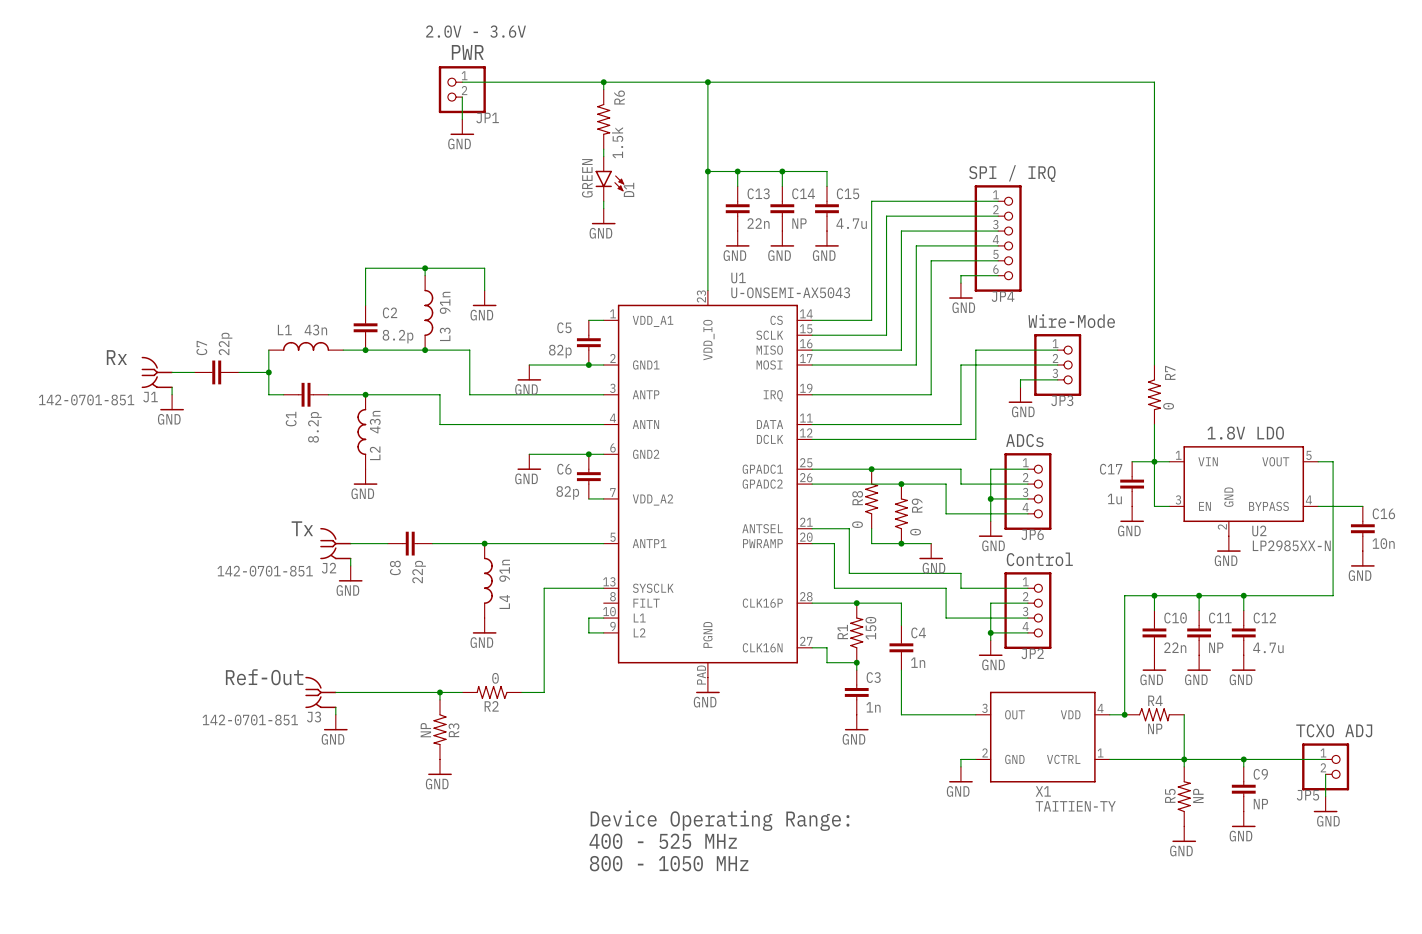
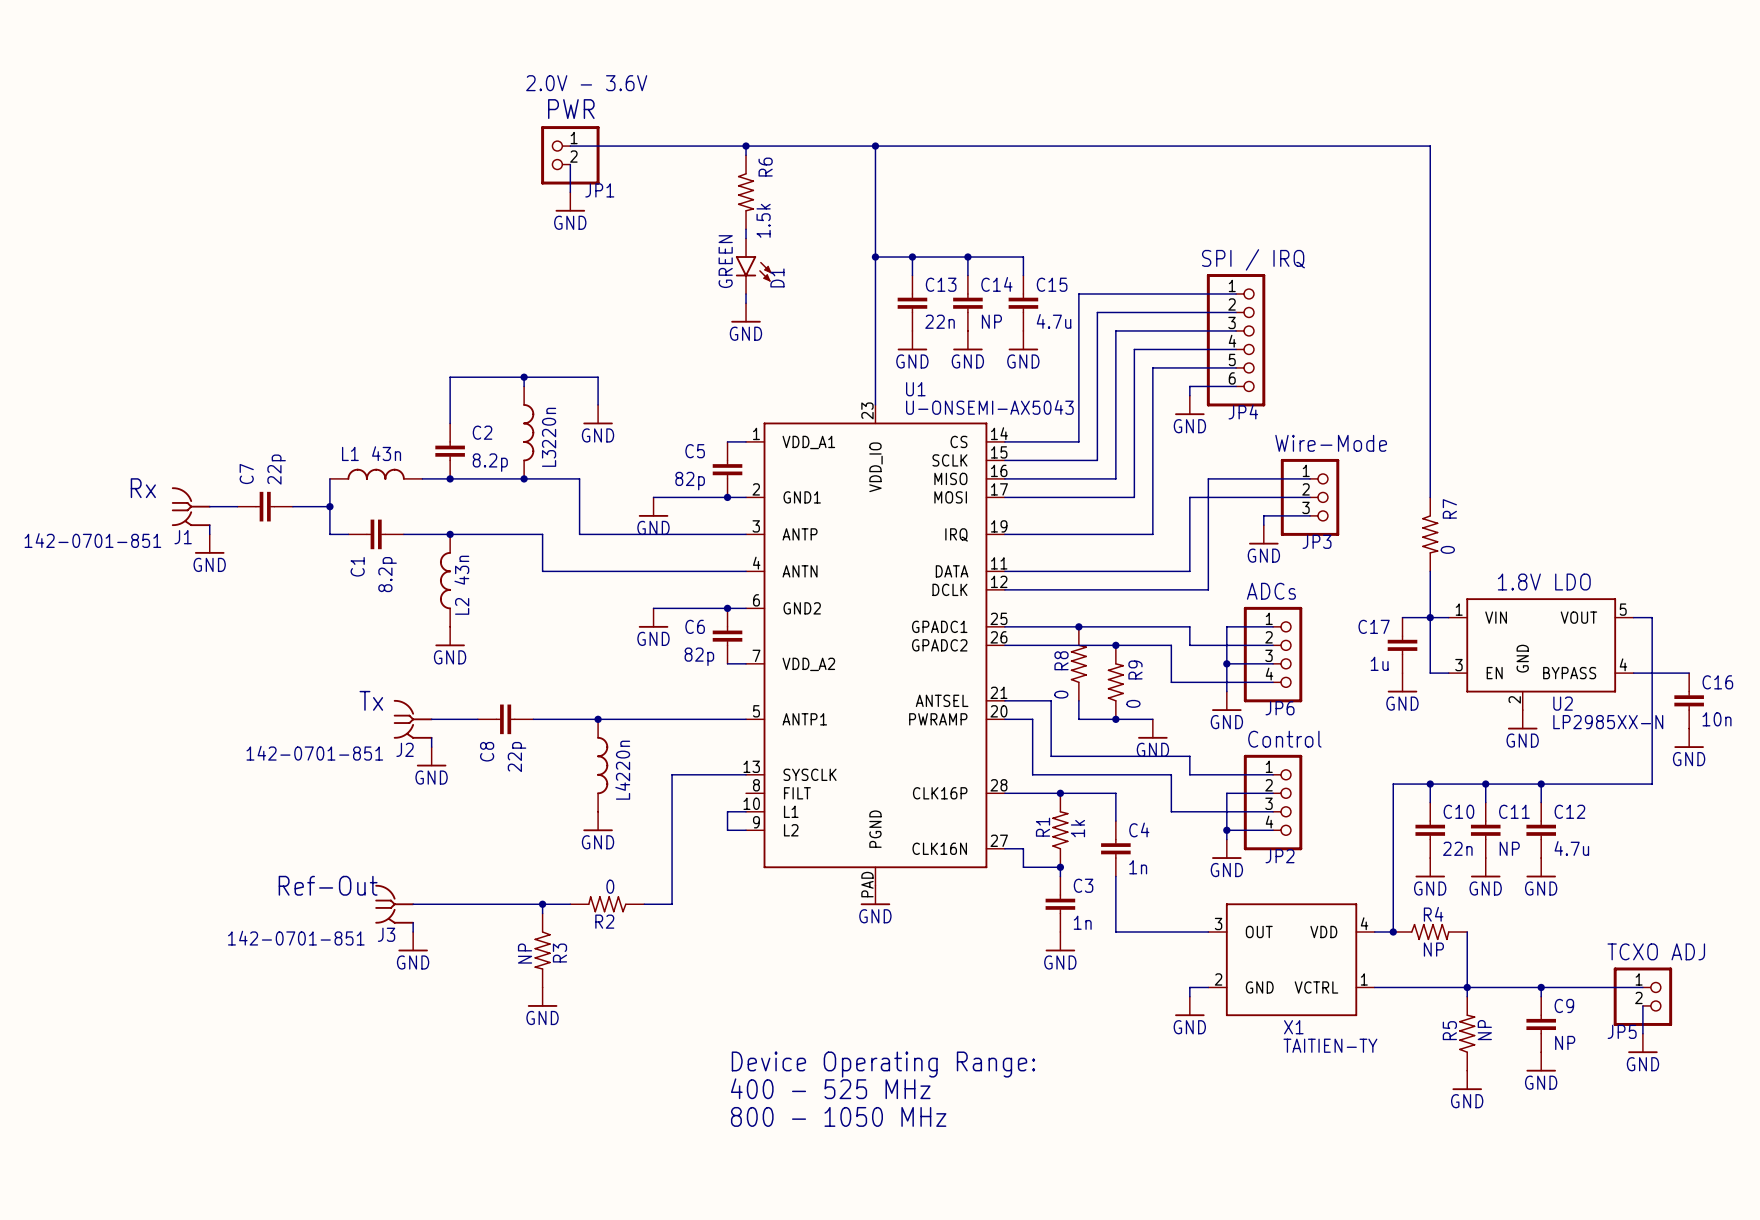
L3 value: 91n (445, 302) -> 220n (549, 428)
L4 value: 91n (504, 570) -> 220n (623, 760)
R1 value: 150 (870, 628) -> 1k (1077, 828)

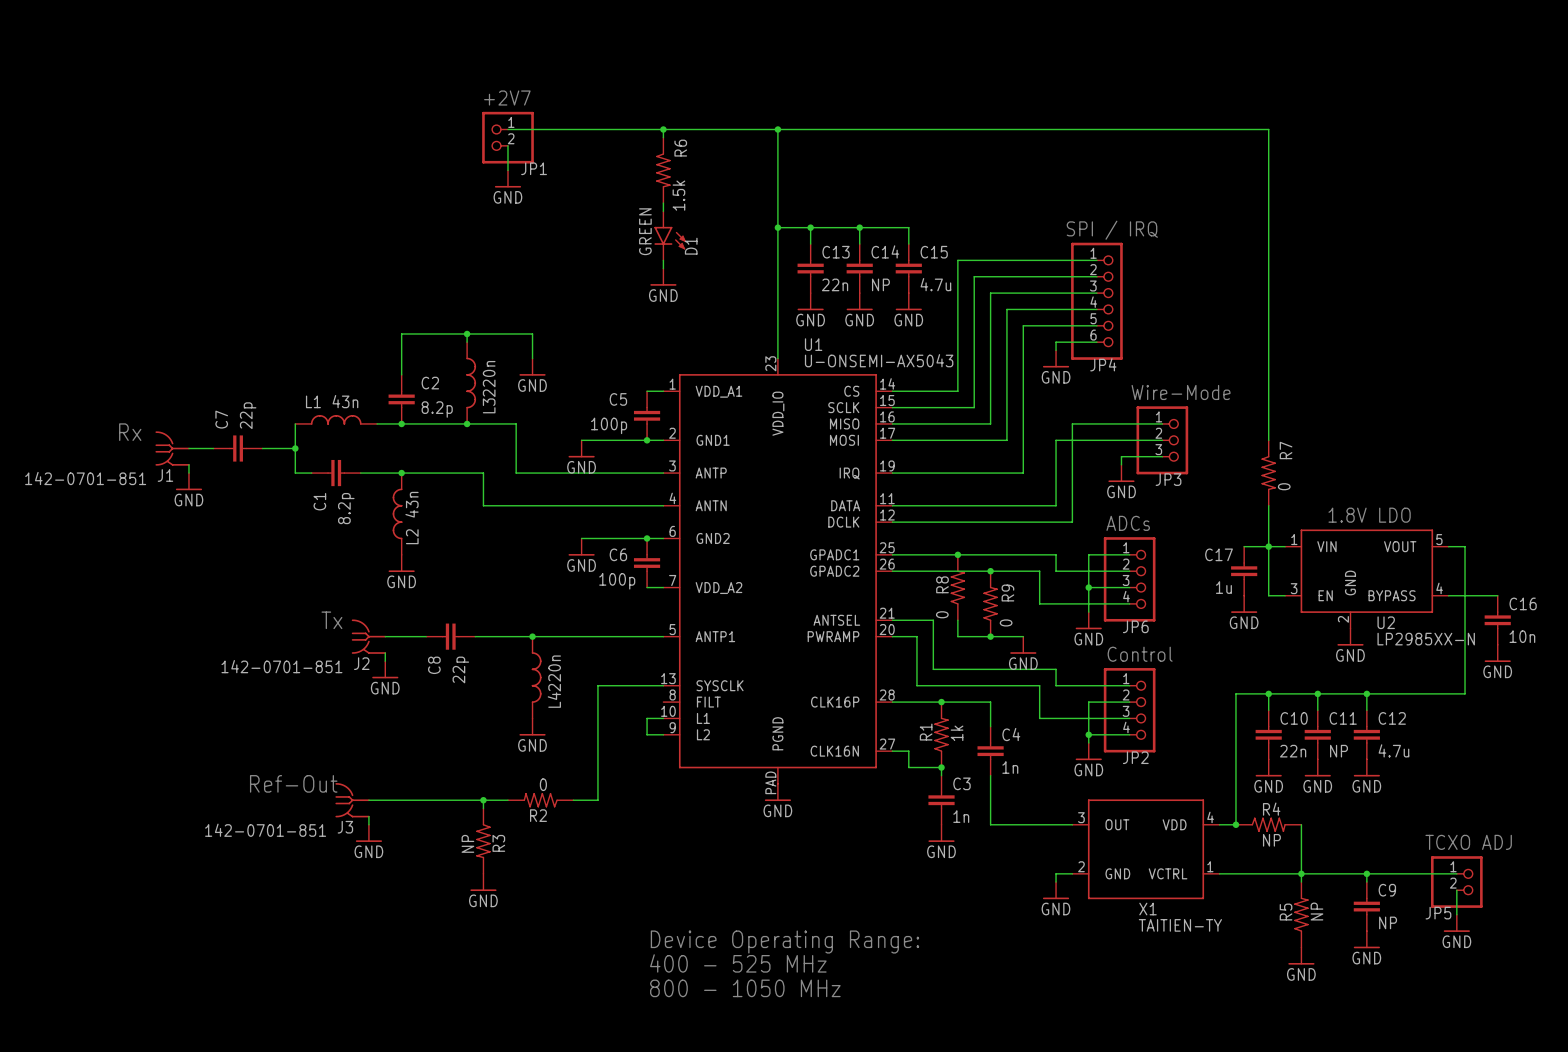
text: 2.0V - 3.6V (586, 83) -> none
text: PWR (571, 109) -> +2V7 (507, 98)
C5 value: 82p (690, 481) -> 100p (609, 425)
C6 value: 82p (699, 656) -> 100p (617, 581)

